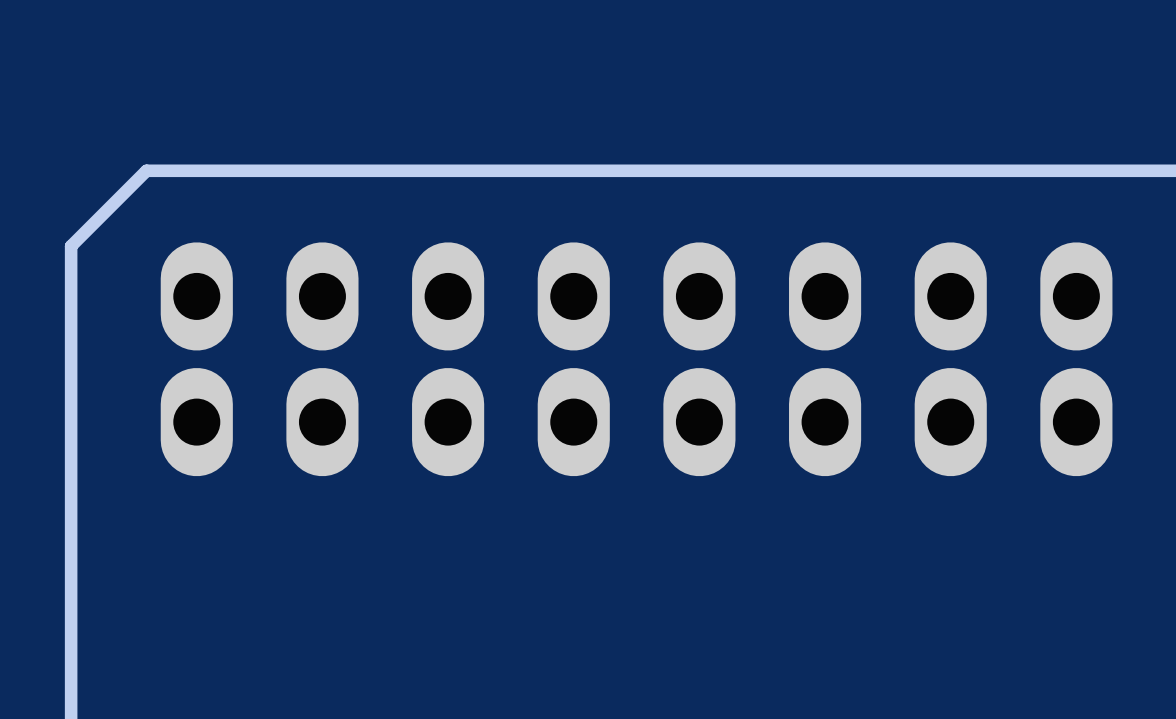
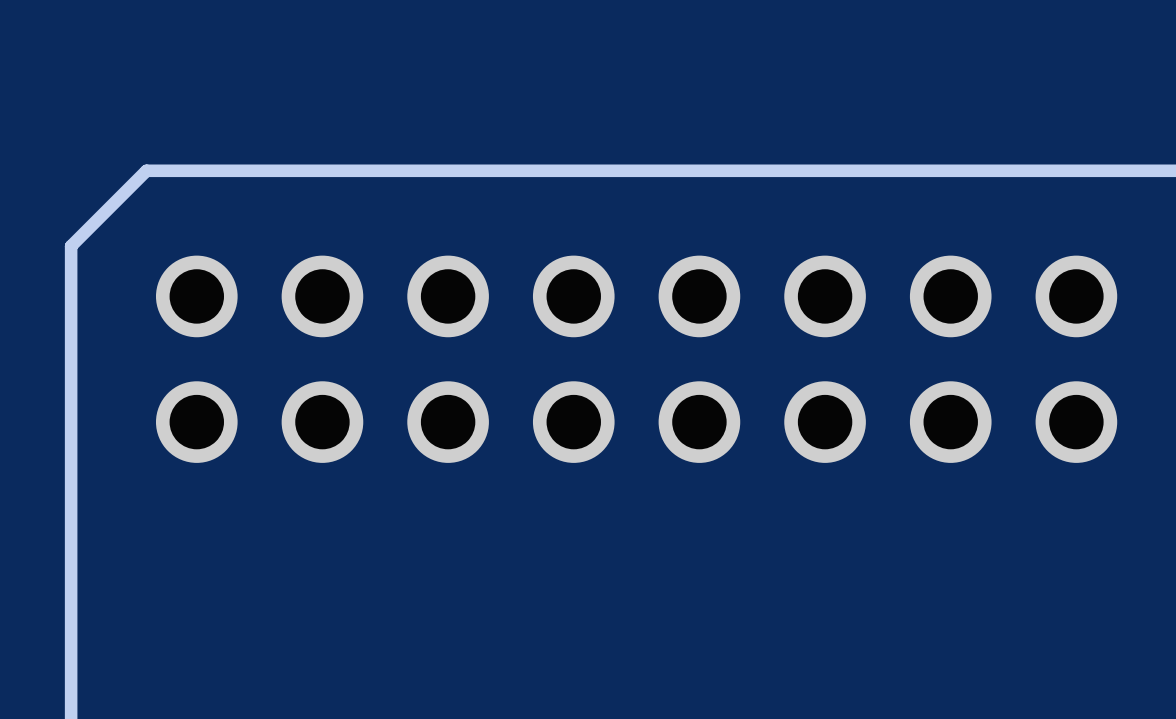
part footprint: [160, 242, 1113, 351] -> [155, 255, 1118, 338]
part footprint: [160, 368, 1113, 477] -> [155, 381, 1118, 463]

